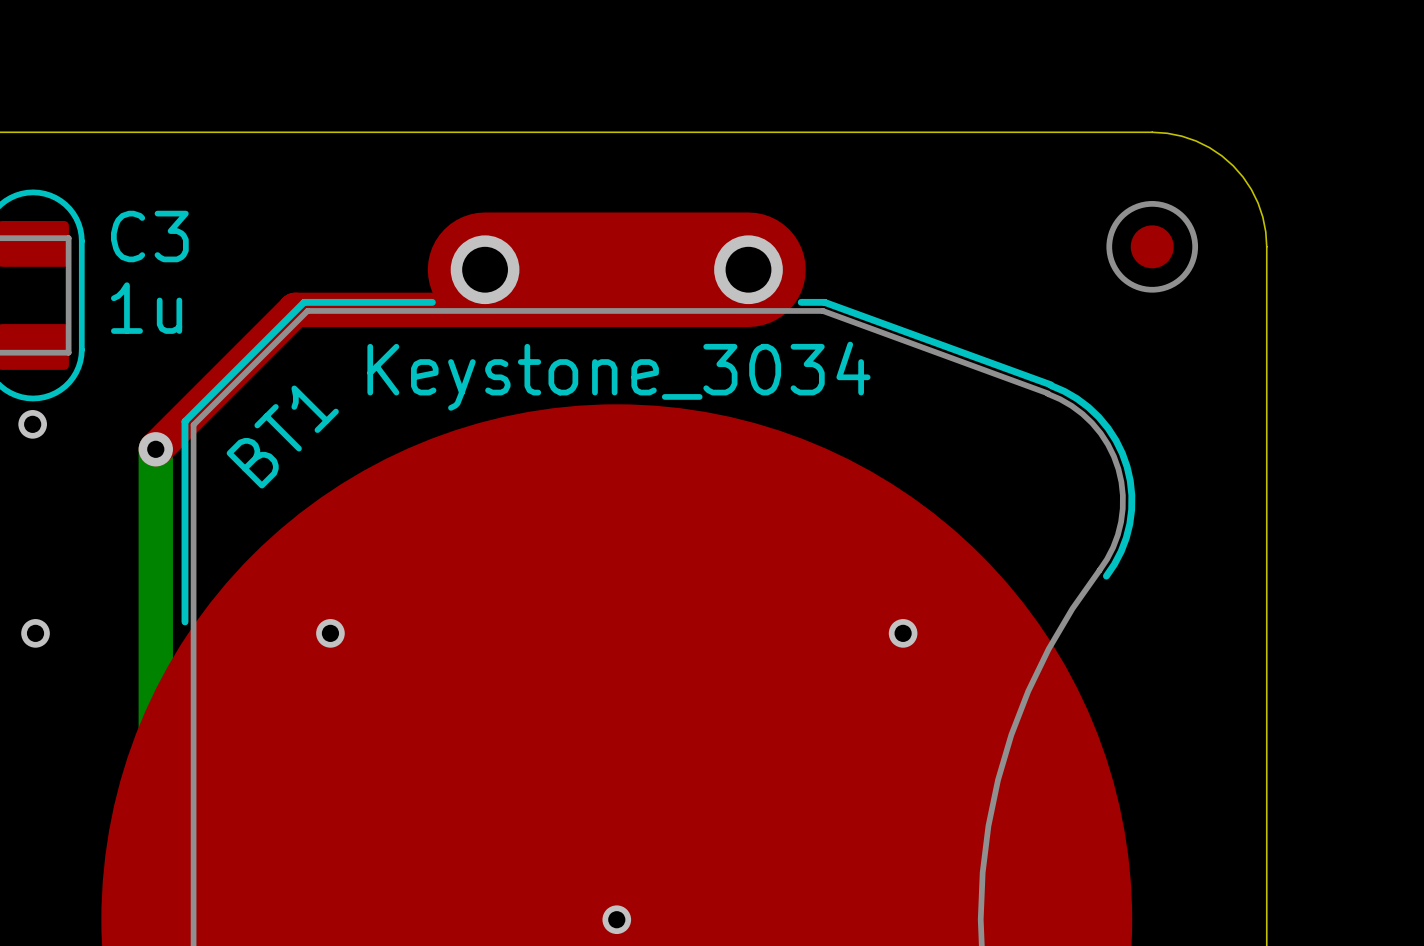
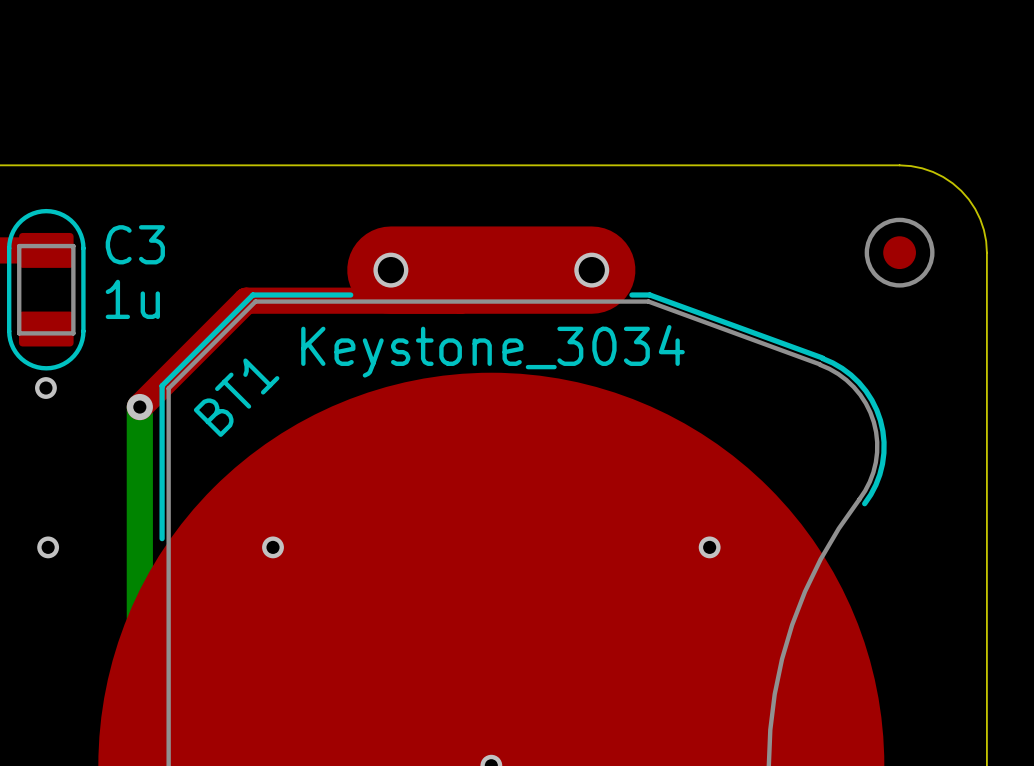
via size: [450, 235, 520, 305] -> [373, 252, 409, 288]
via size: [714, 235, 783, 305] -> [574, 252, 610, 288]

